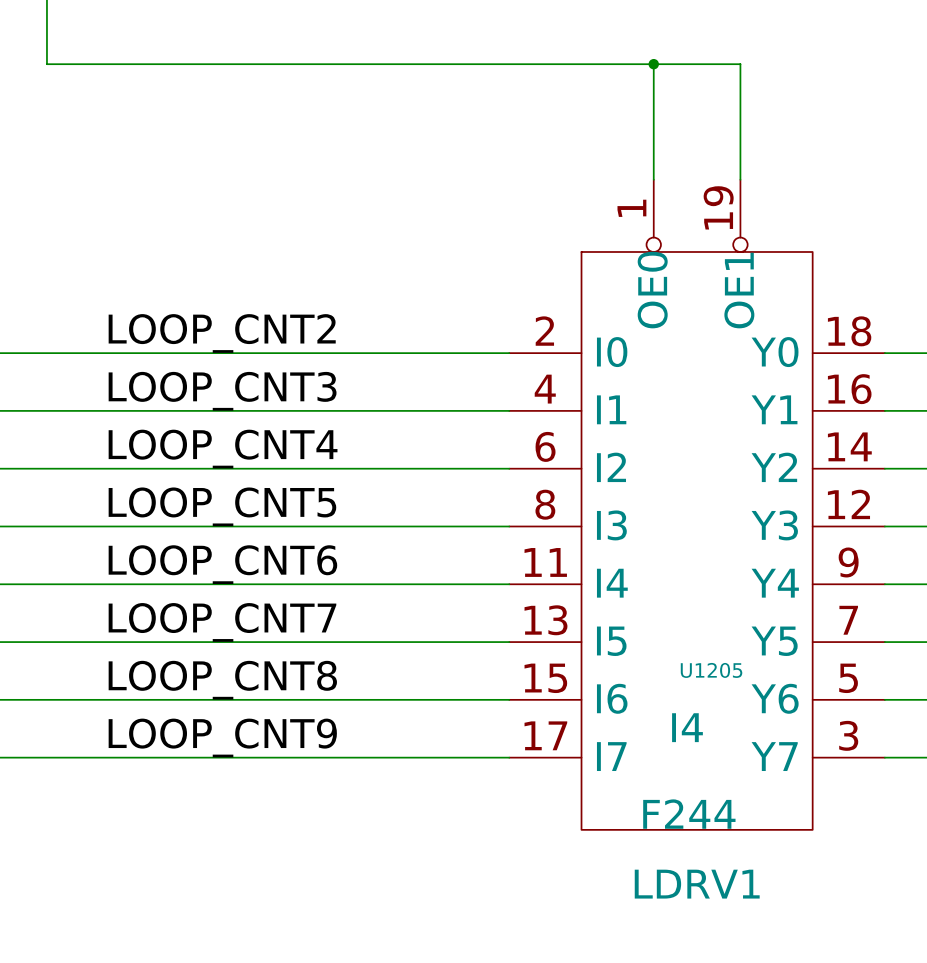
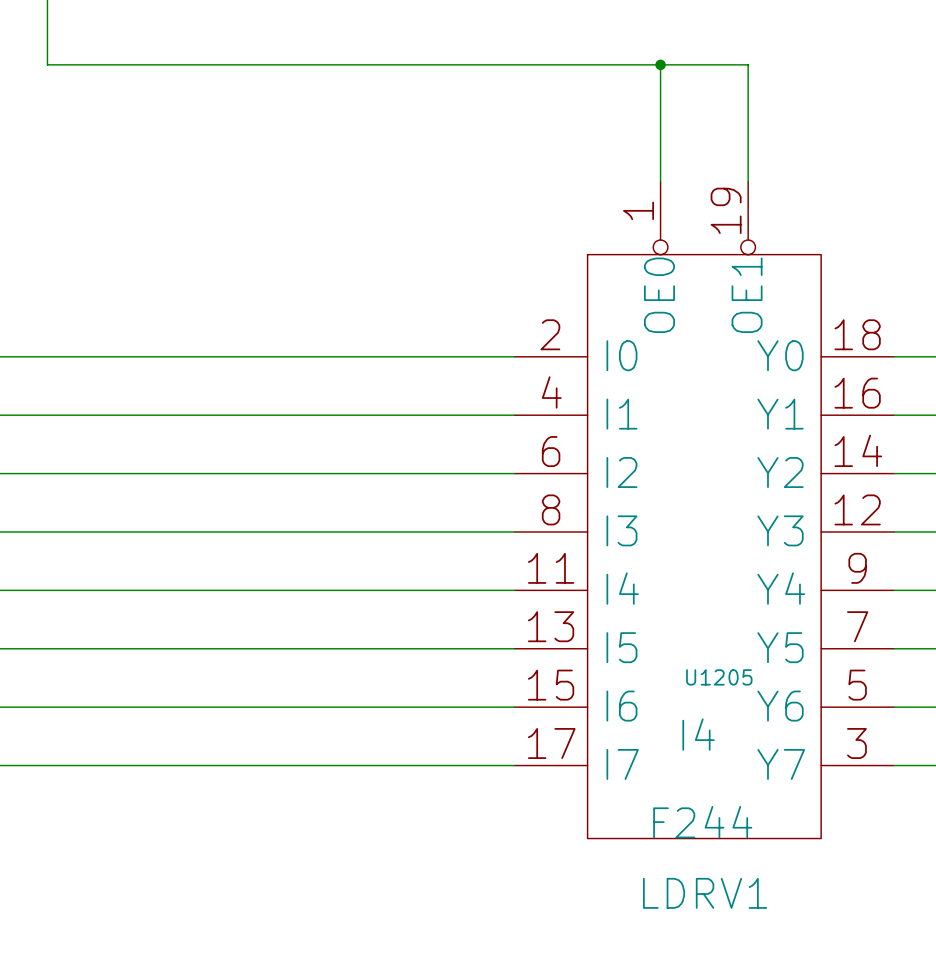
label: LOOP_CNT2 (222, 333) -> none
label: LOOP_CNT3 (222, 391) -> none
label: LOOP_CNT4 (223, 449) -> none
label: LOOP_CNT5 (222, 506) -> none
label: LOOP_CNT6 (222, 564) -> none
label: LOOP_CNT7 (222, 622) -> none
label: LOOP_CNT8 (222, 680) -> none
label: LOOP_CNT9 (222, 738) -> none

